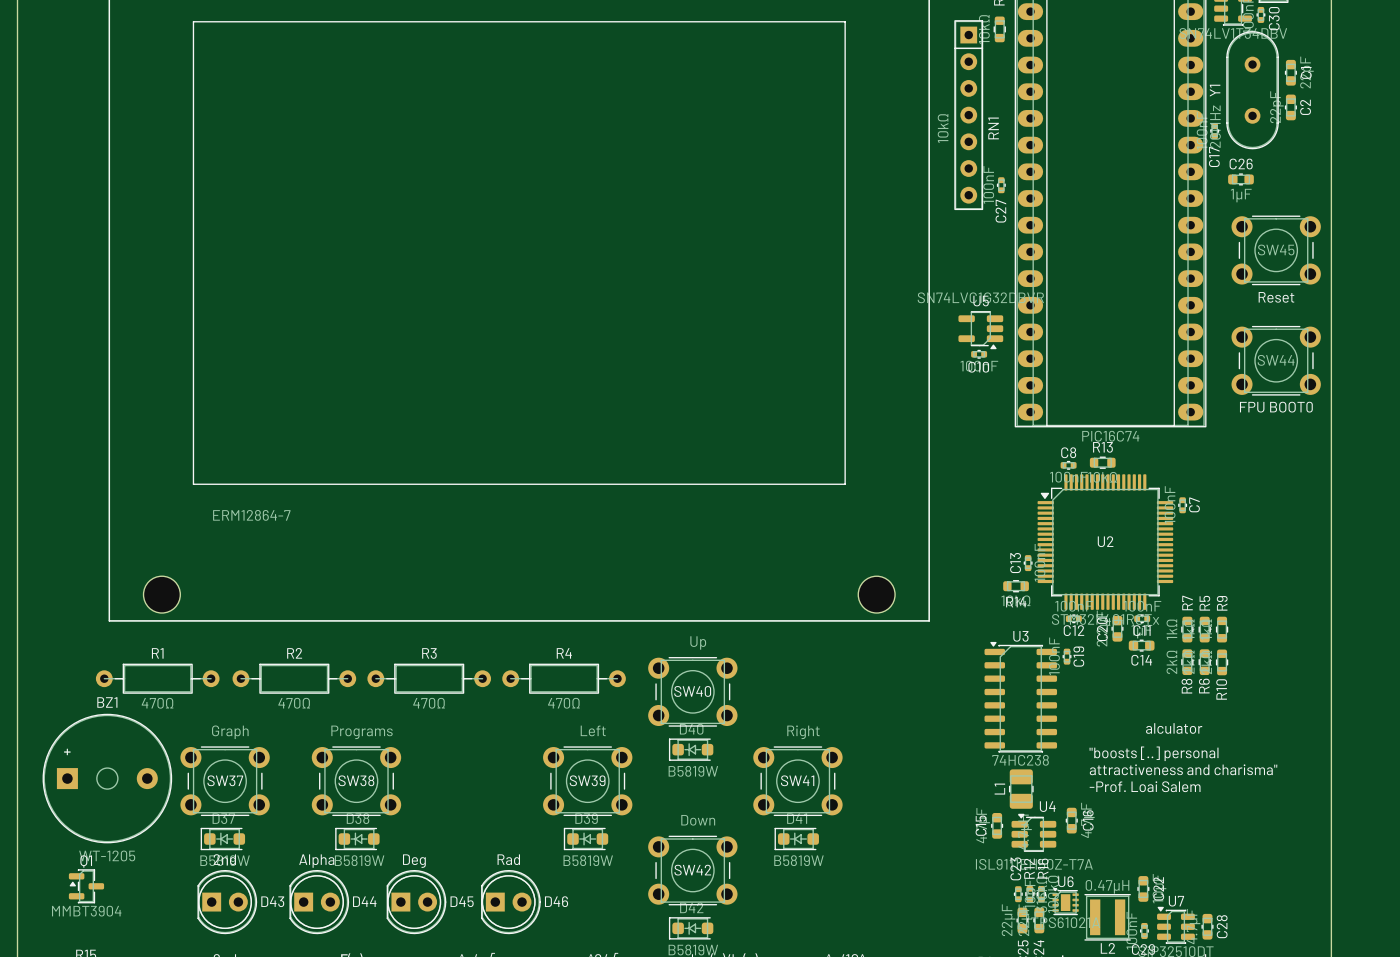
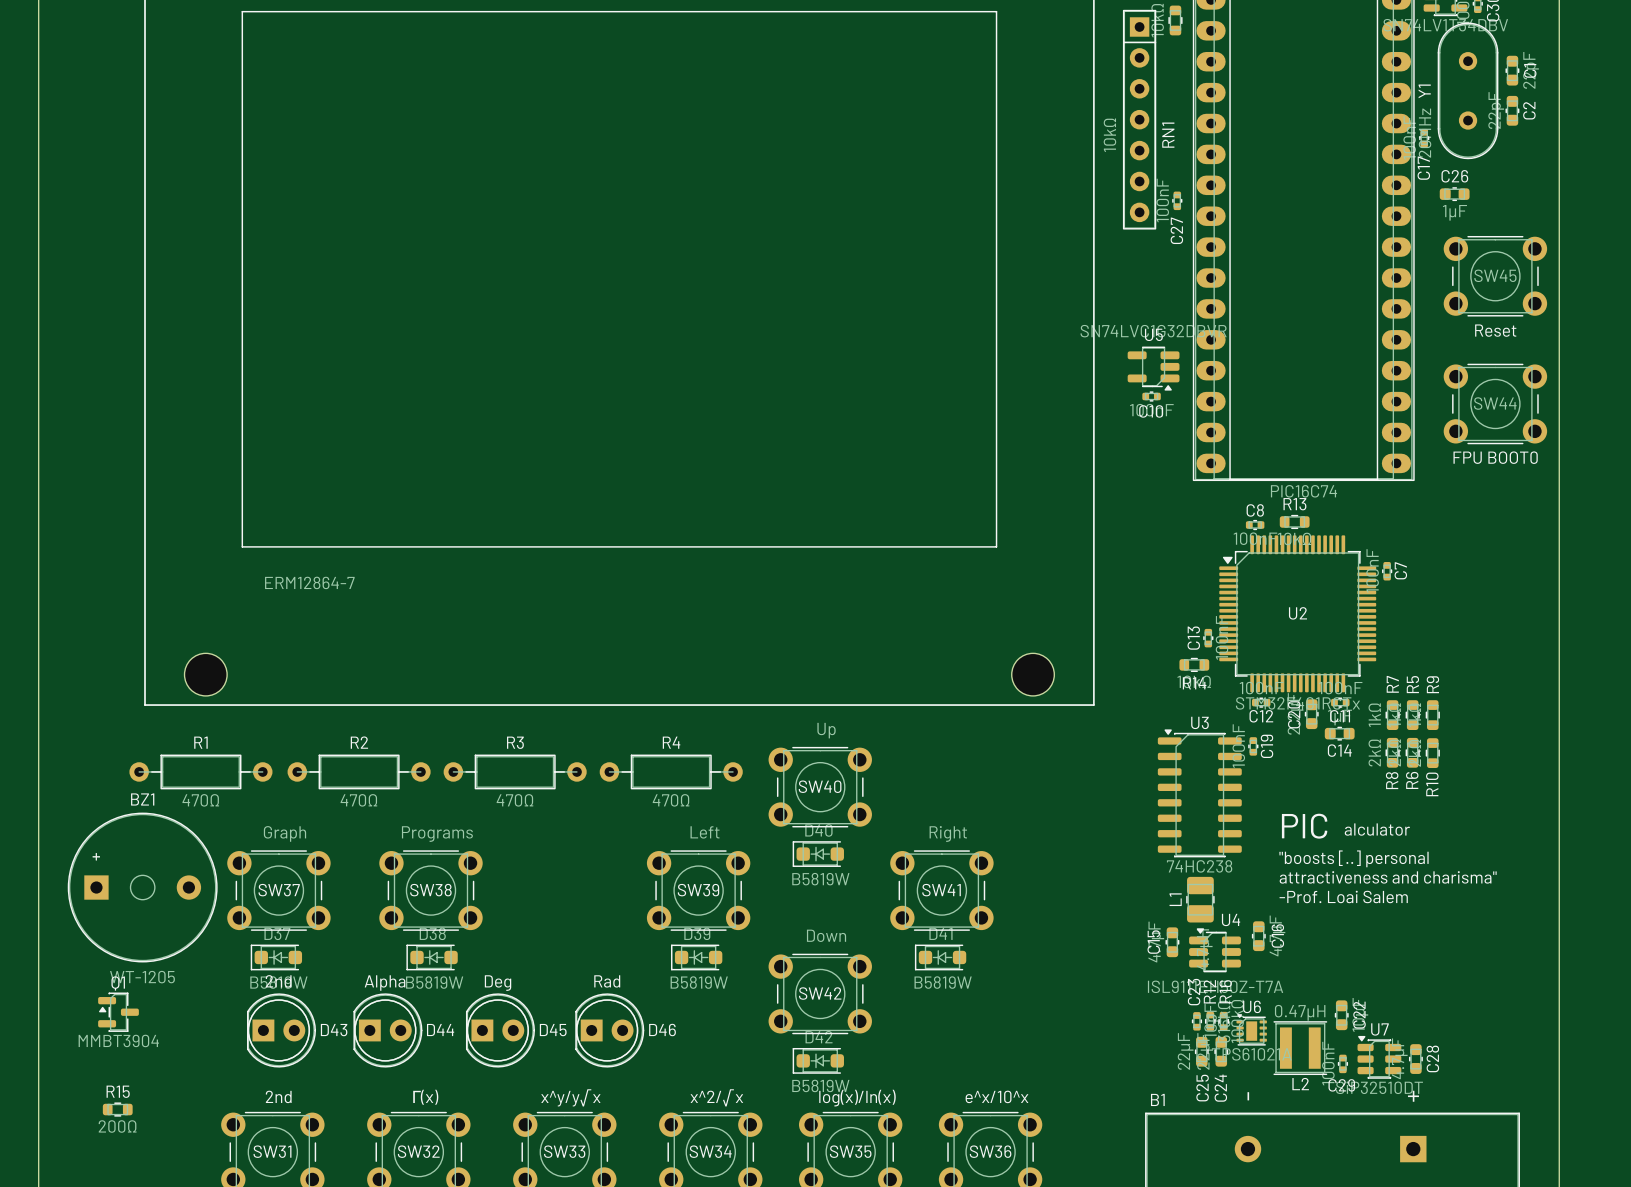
text: none -> PIC (1304, 826)

